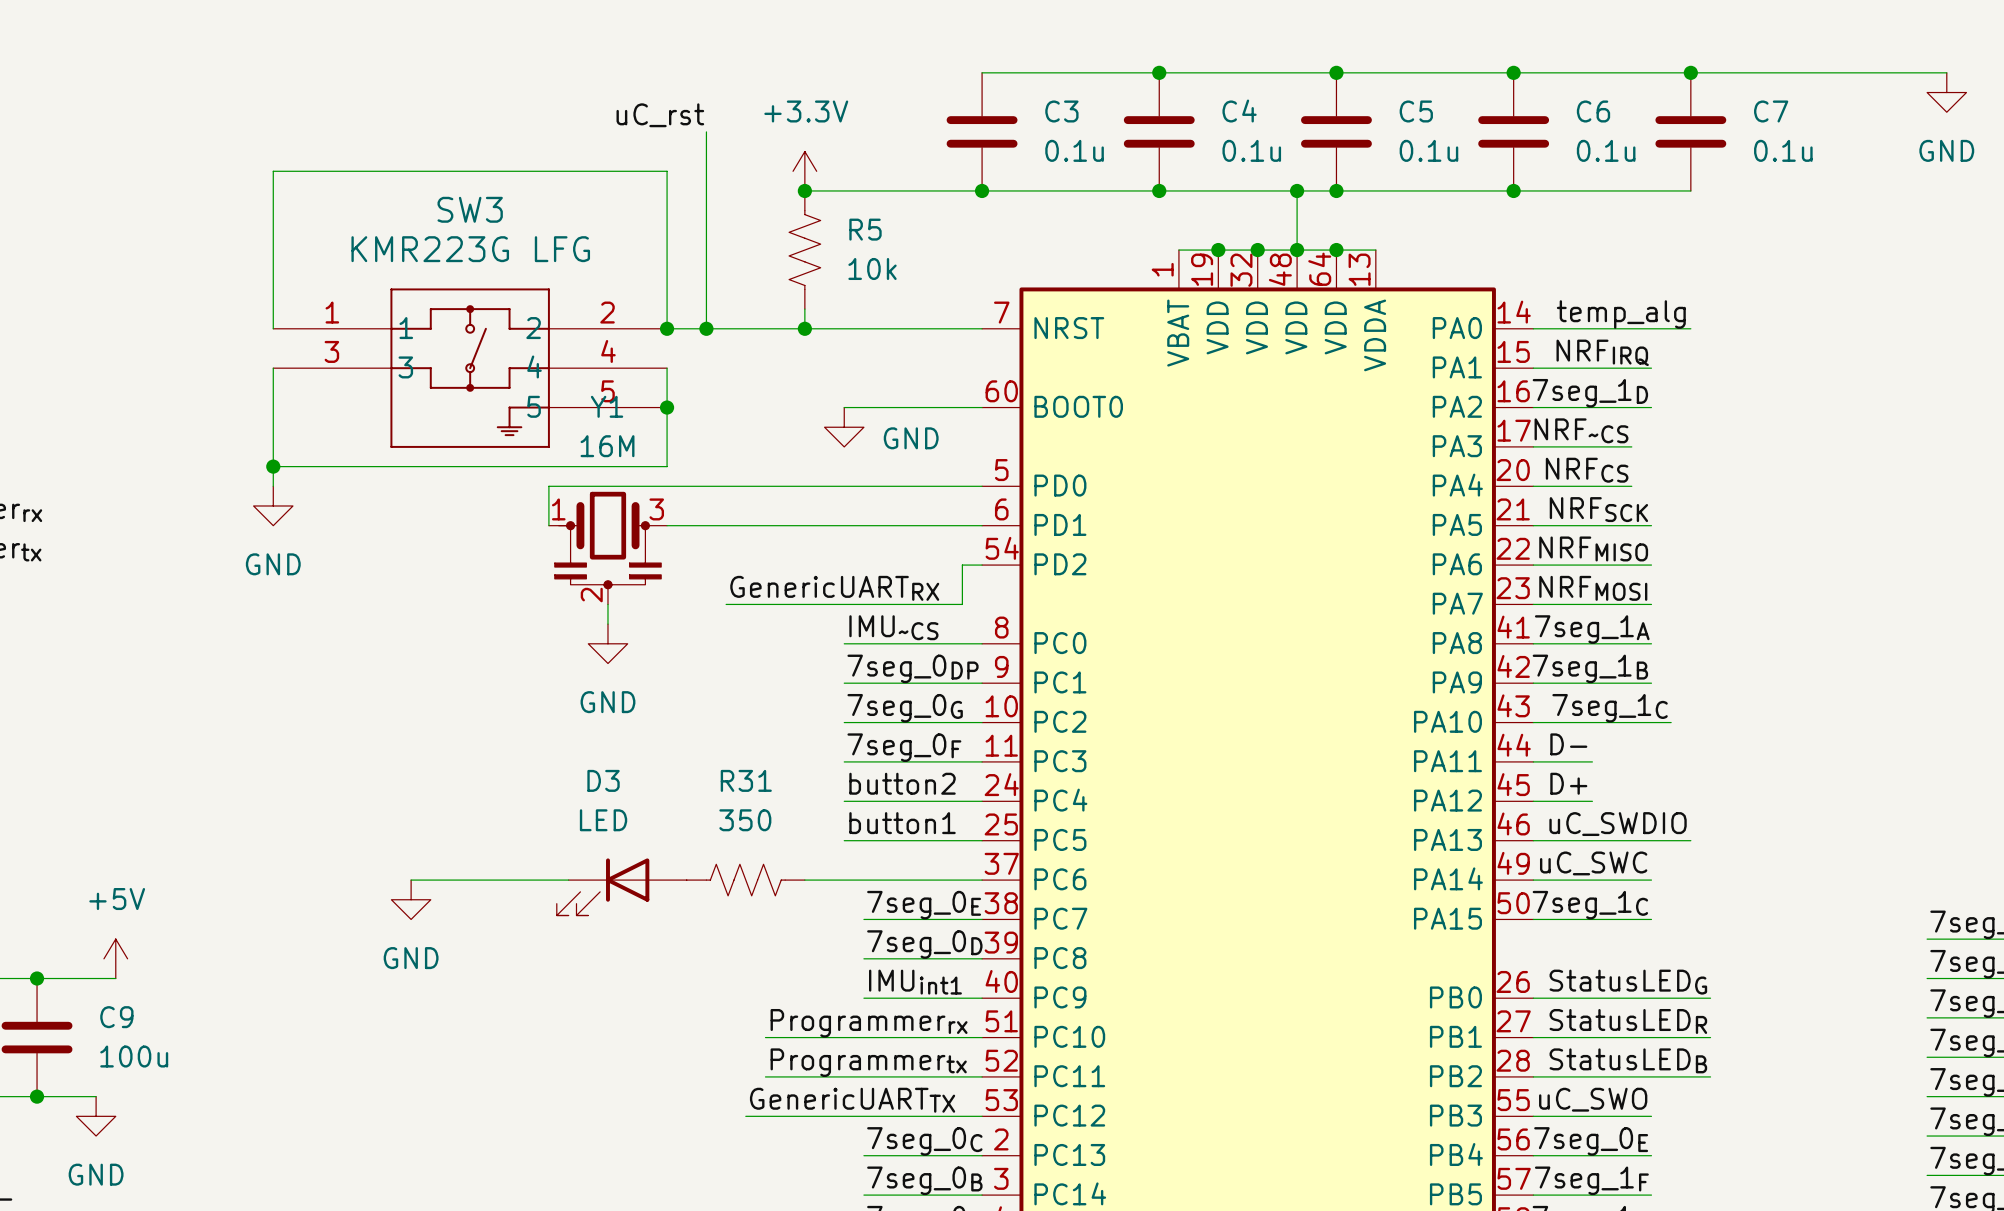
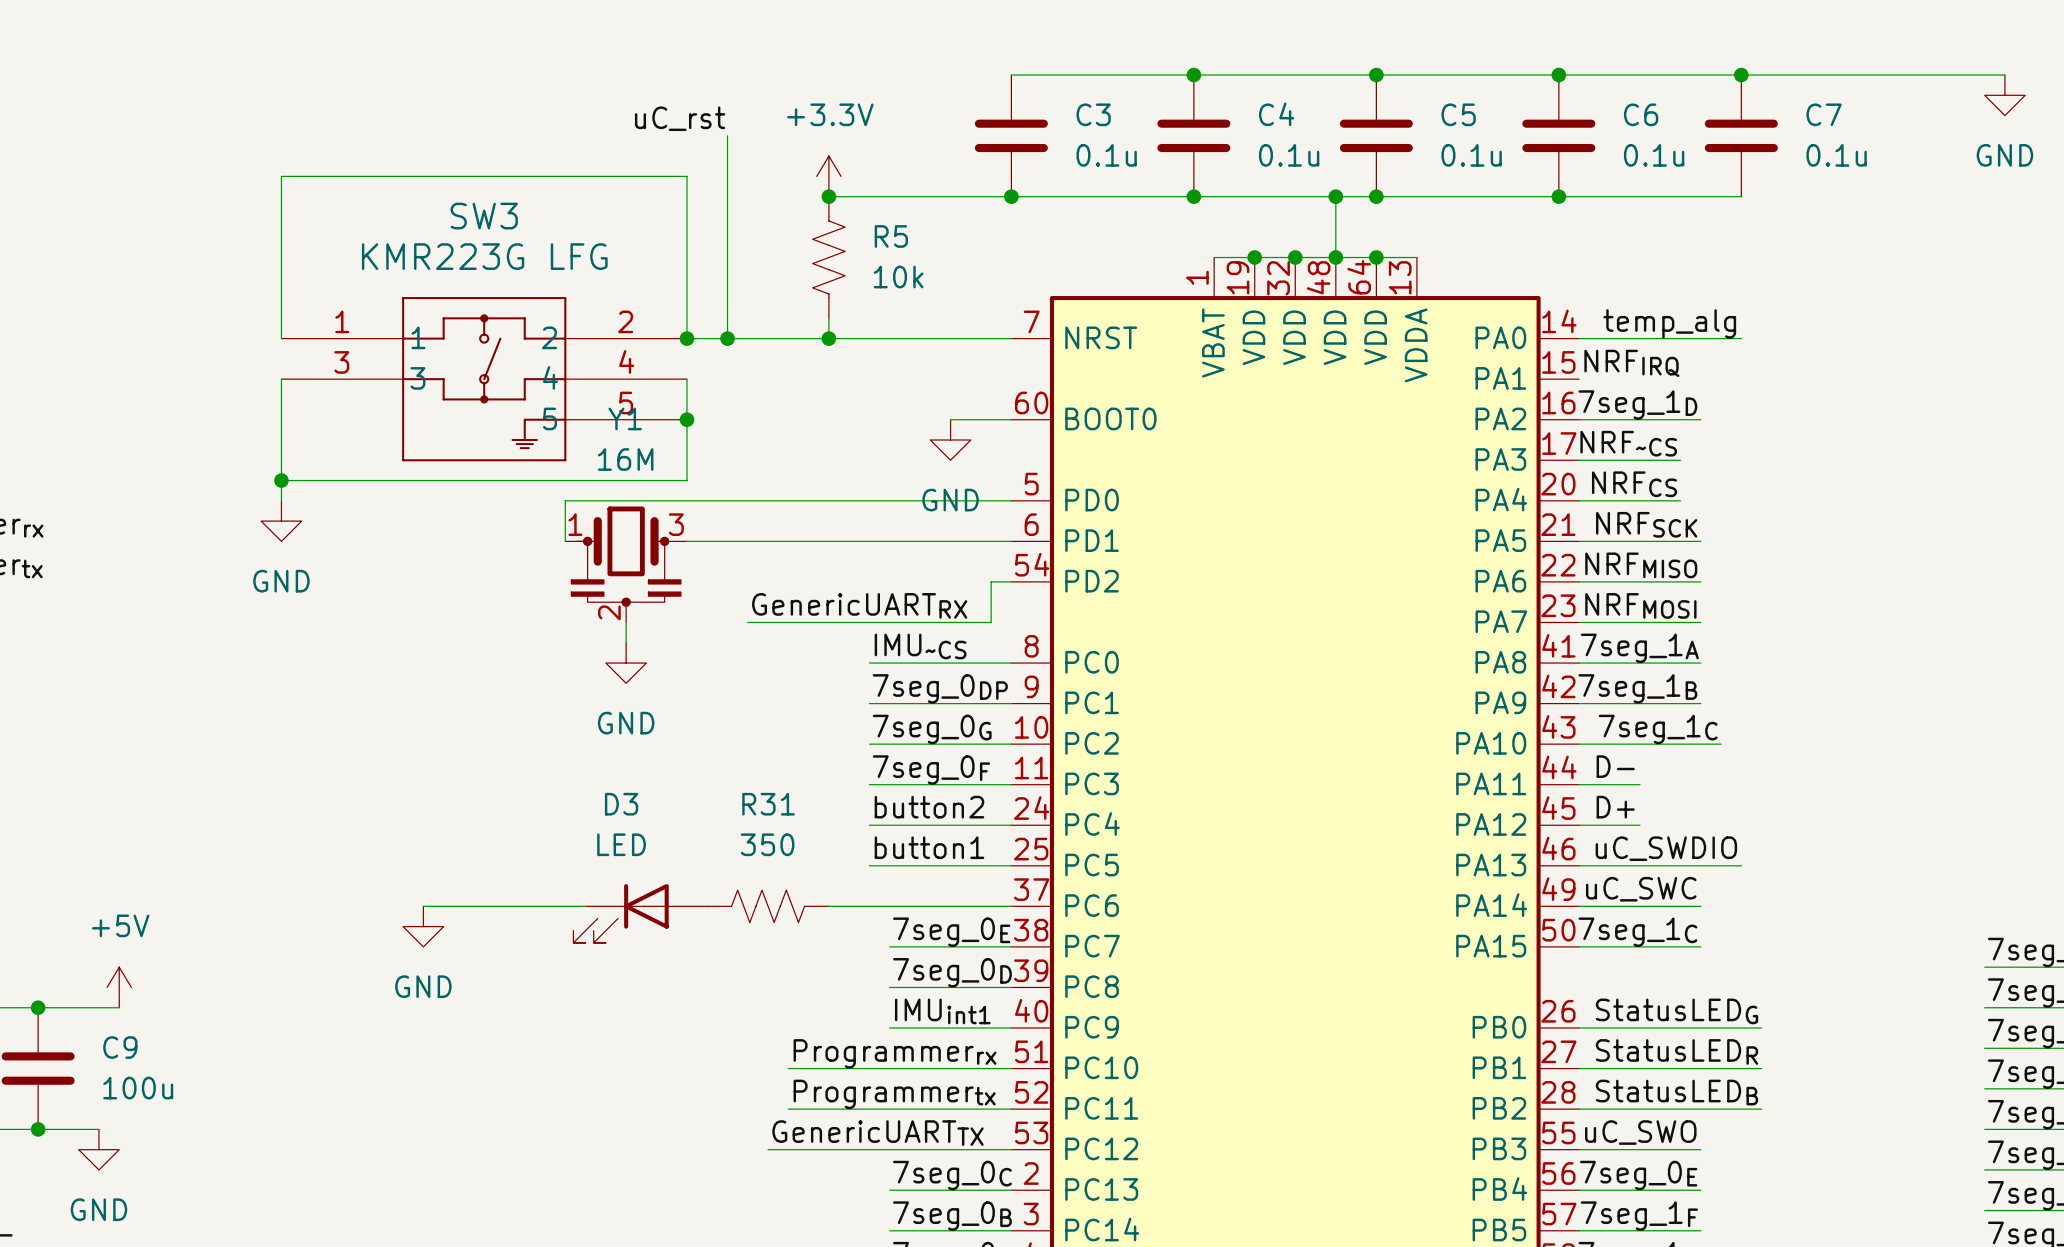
label position: NRFIRQ (1602, 352) -> NRFIRQ (1631, 363)
wire: (1533, 368) (1651, 368) -> none
wire: (844, 407) (923, 407) -> none
power symbol position: GND (844, 427) -> GND (950, 440)
power symbol text position: GND (911, 438) -> GND (950, 500)

